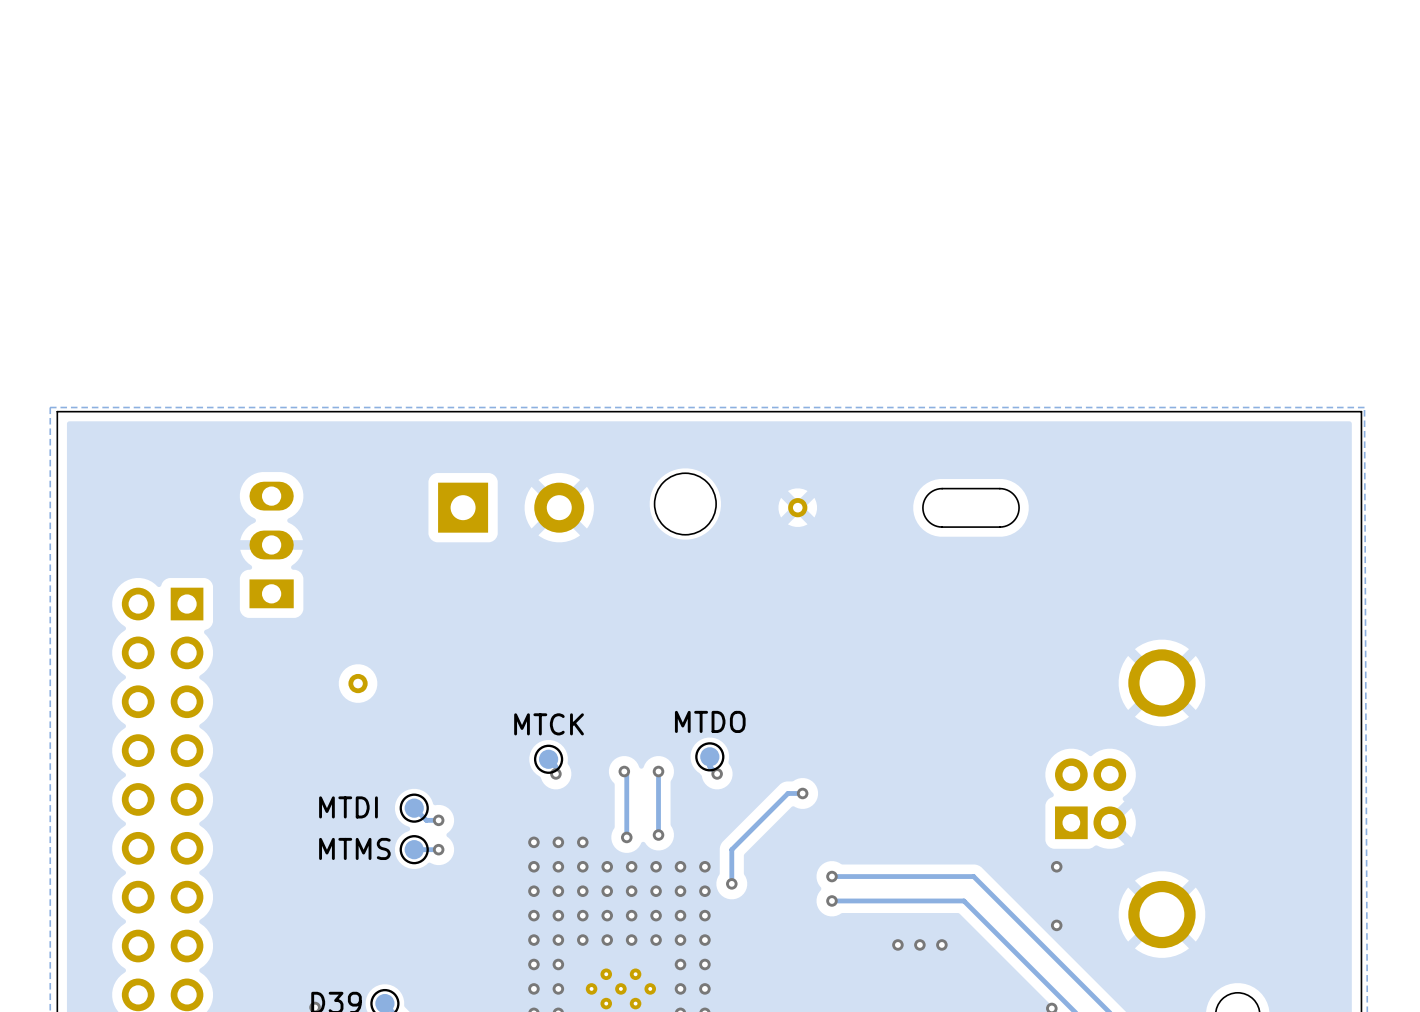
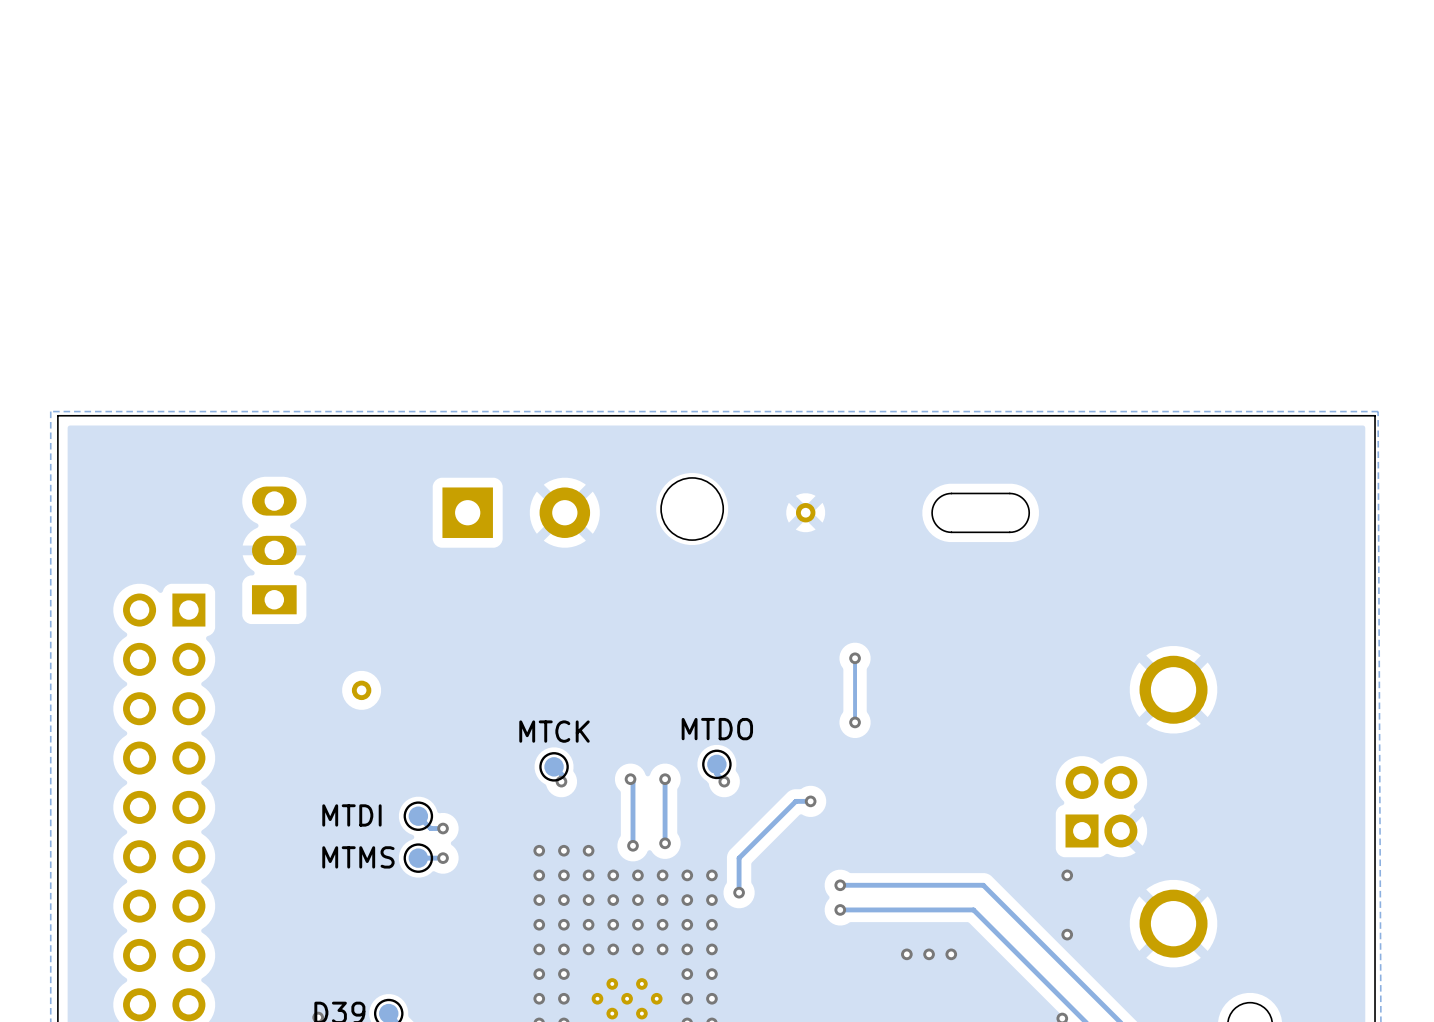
track: none -> (855, 658) (855, 722)
via: none -> (855, 658)
via: none -> (855, 722)

